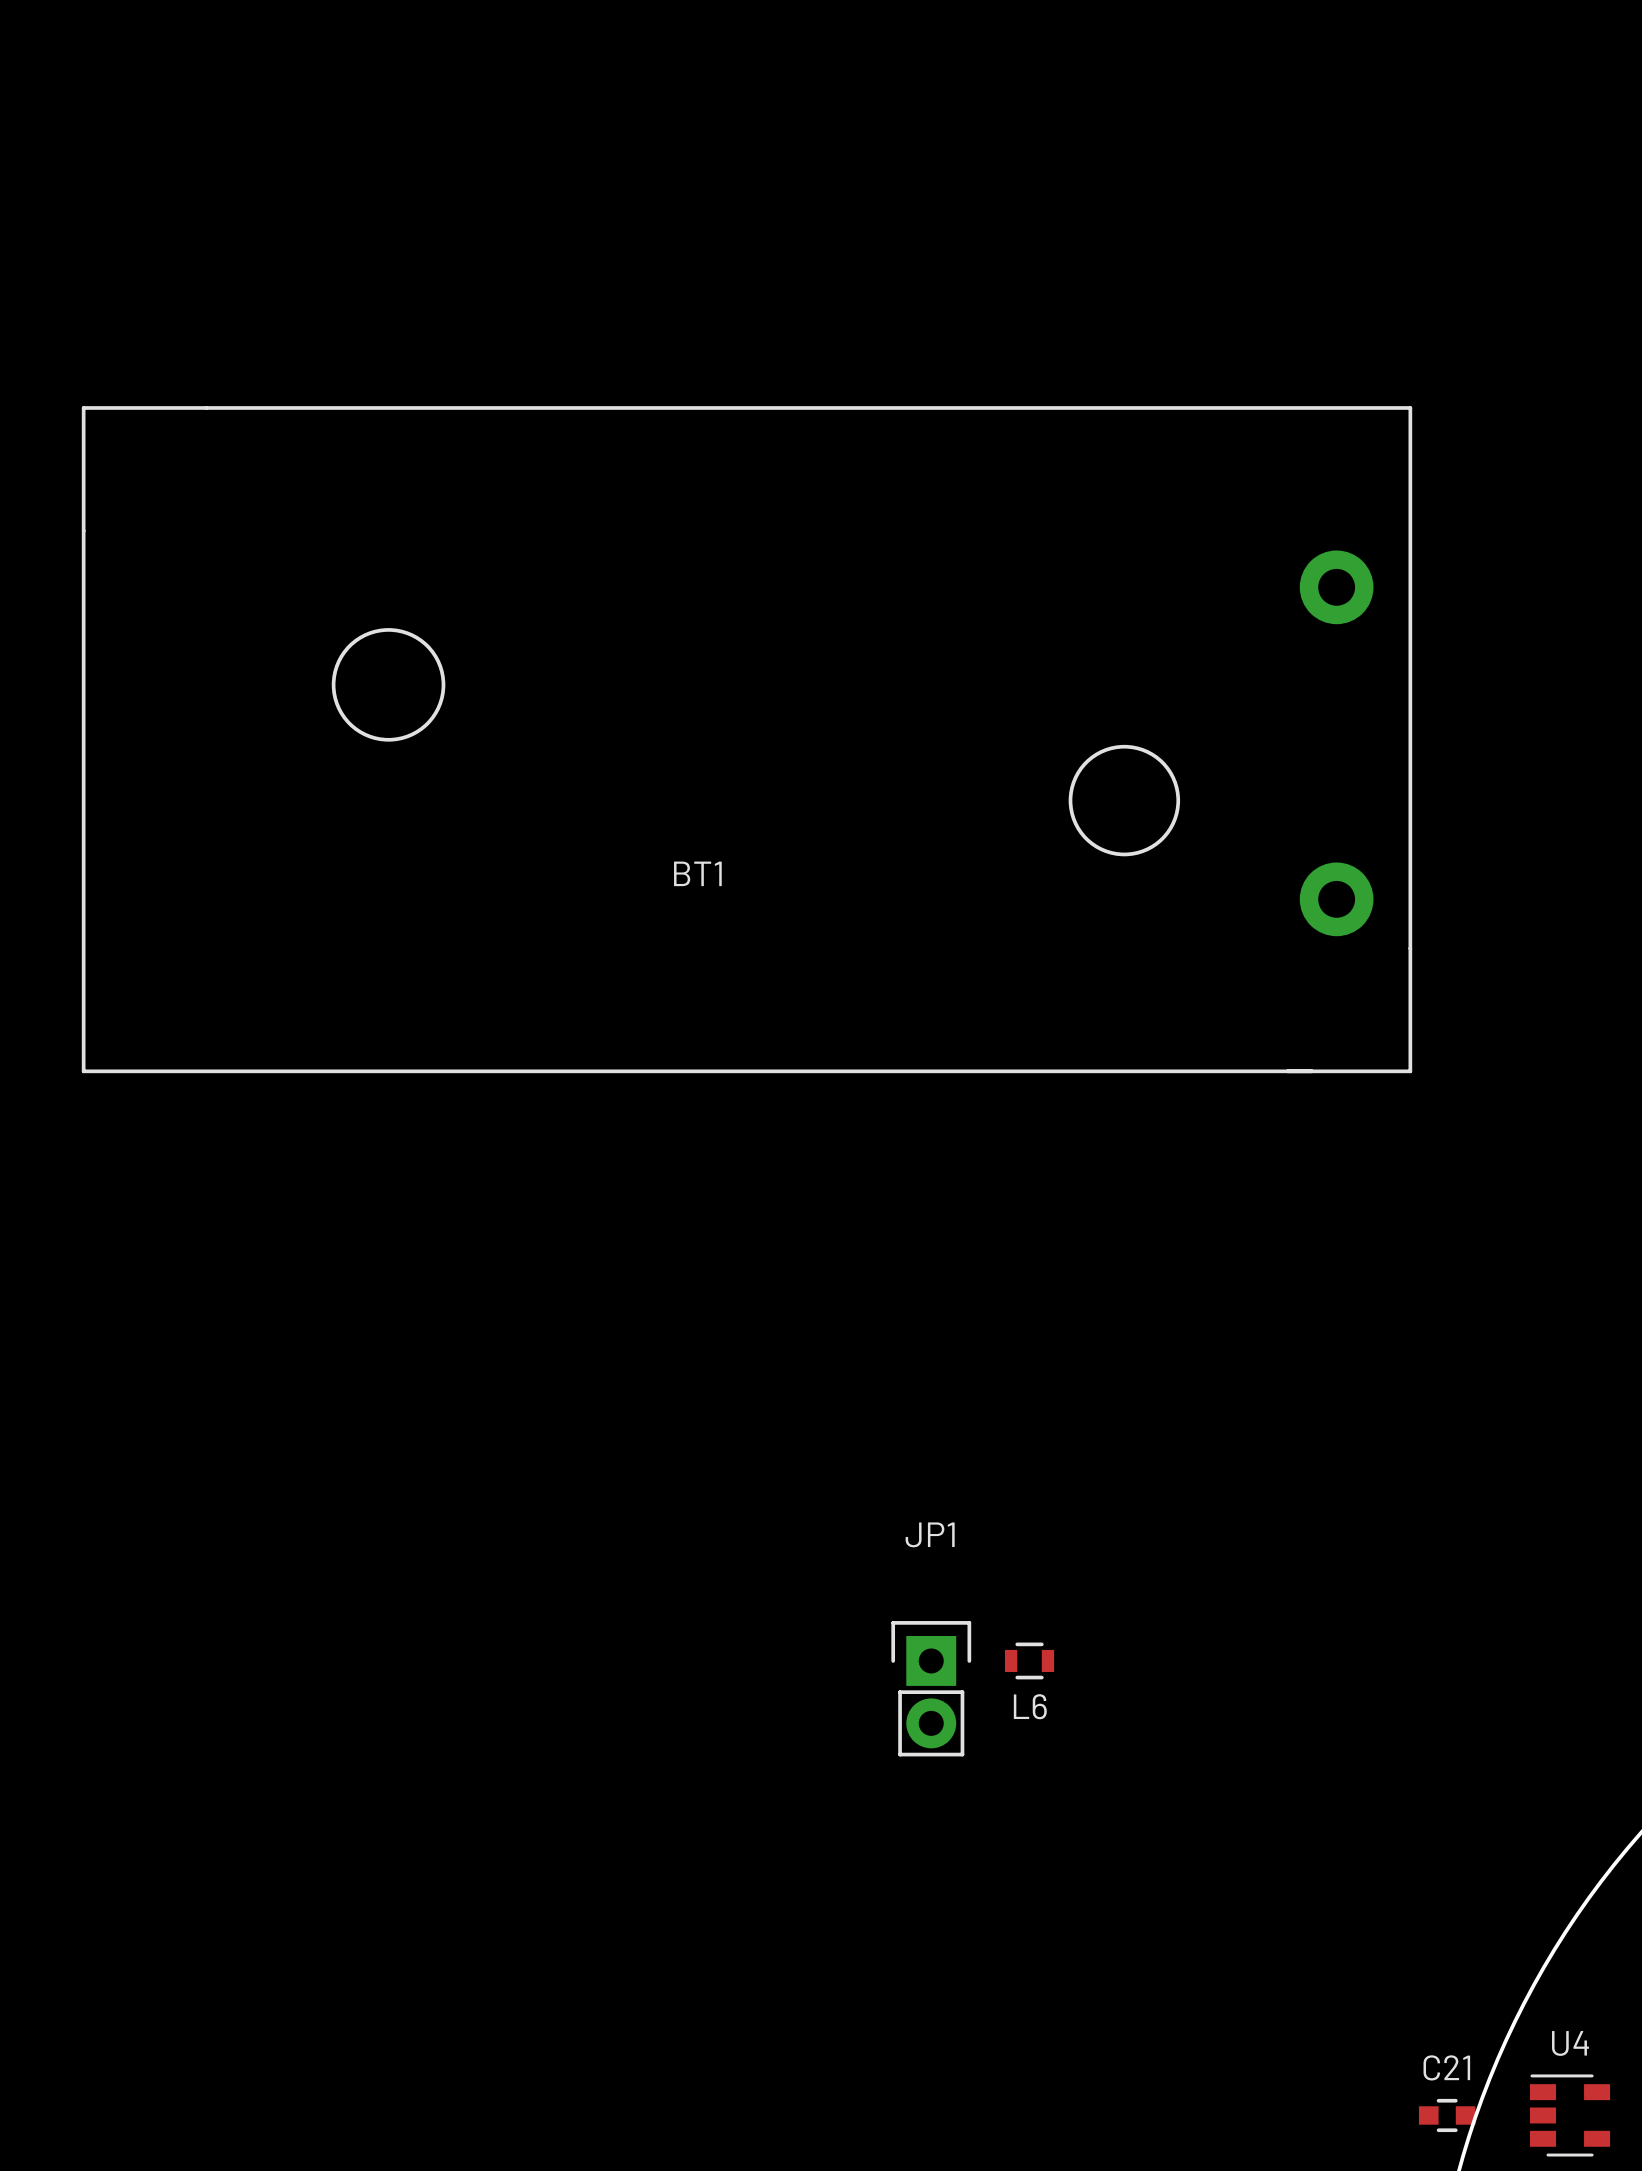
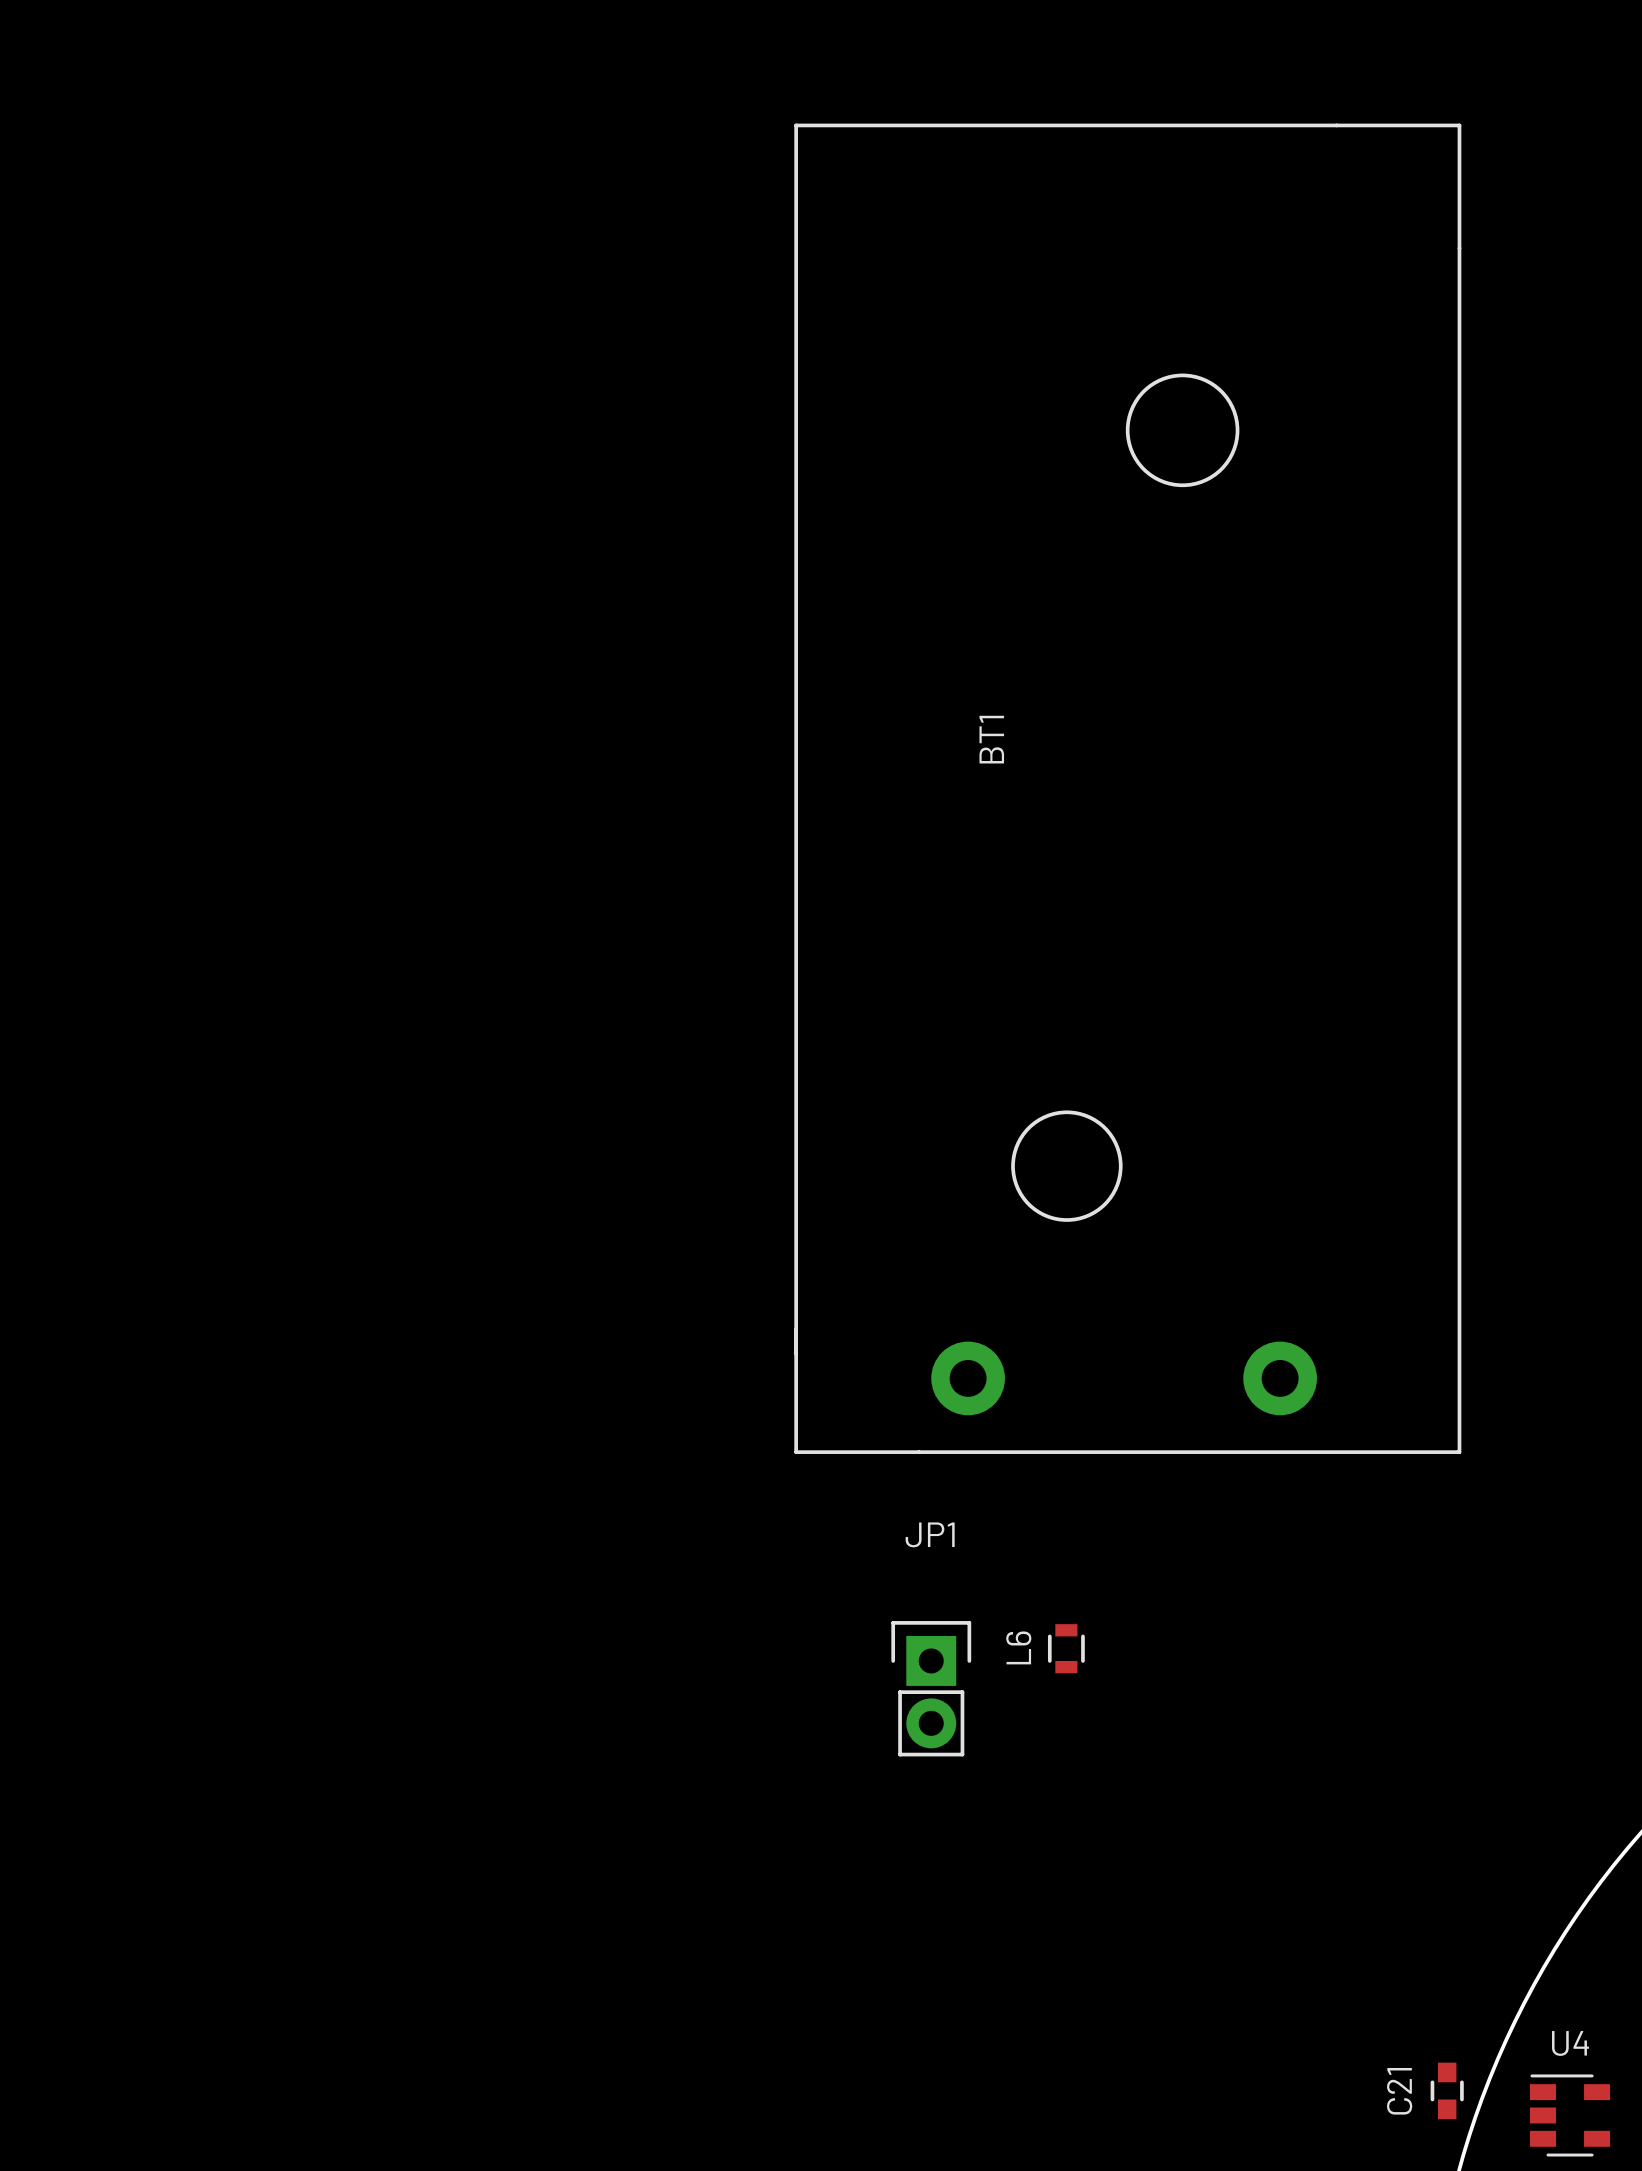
BT1 rotation: 0° (747, 739) -> 90° clockwise (1127, 788)
L6 rotation: 0° (1029, 1660) -> 90° clockwise (1066, 1648)
L6 position: (1029, 1660) -> (1066, 1648)
C21 name position: C21 (1446, 2067) -> C21 (1399, 2091)
C21 rotation: 0° (1447, 2115) -> 90° clockwise (1447, 2090)

